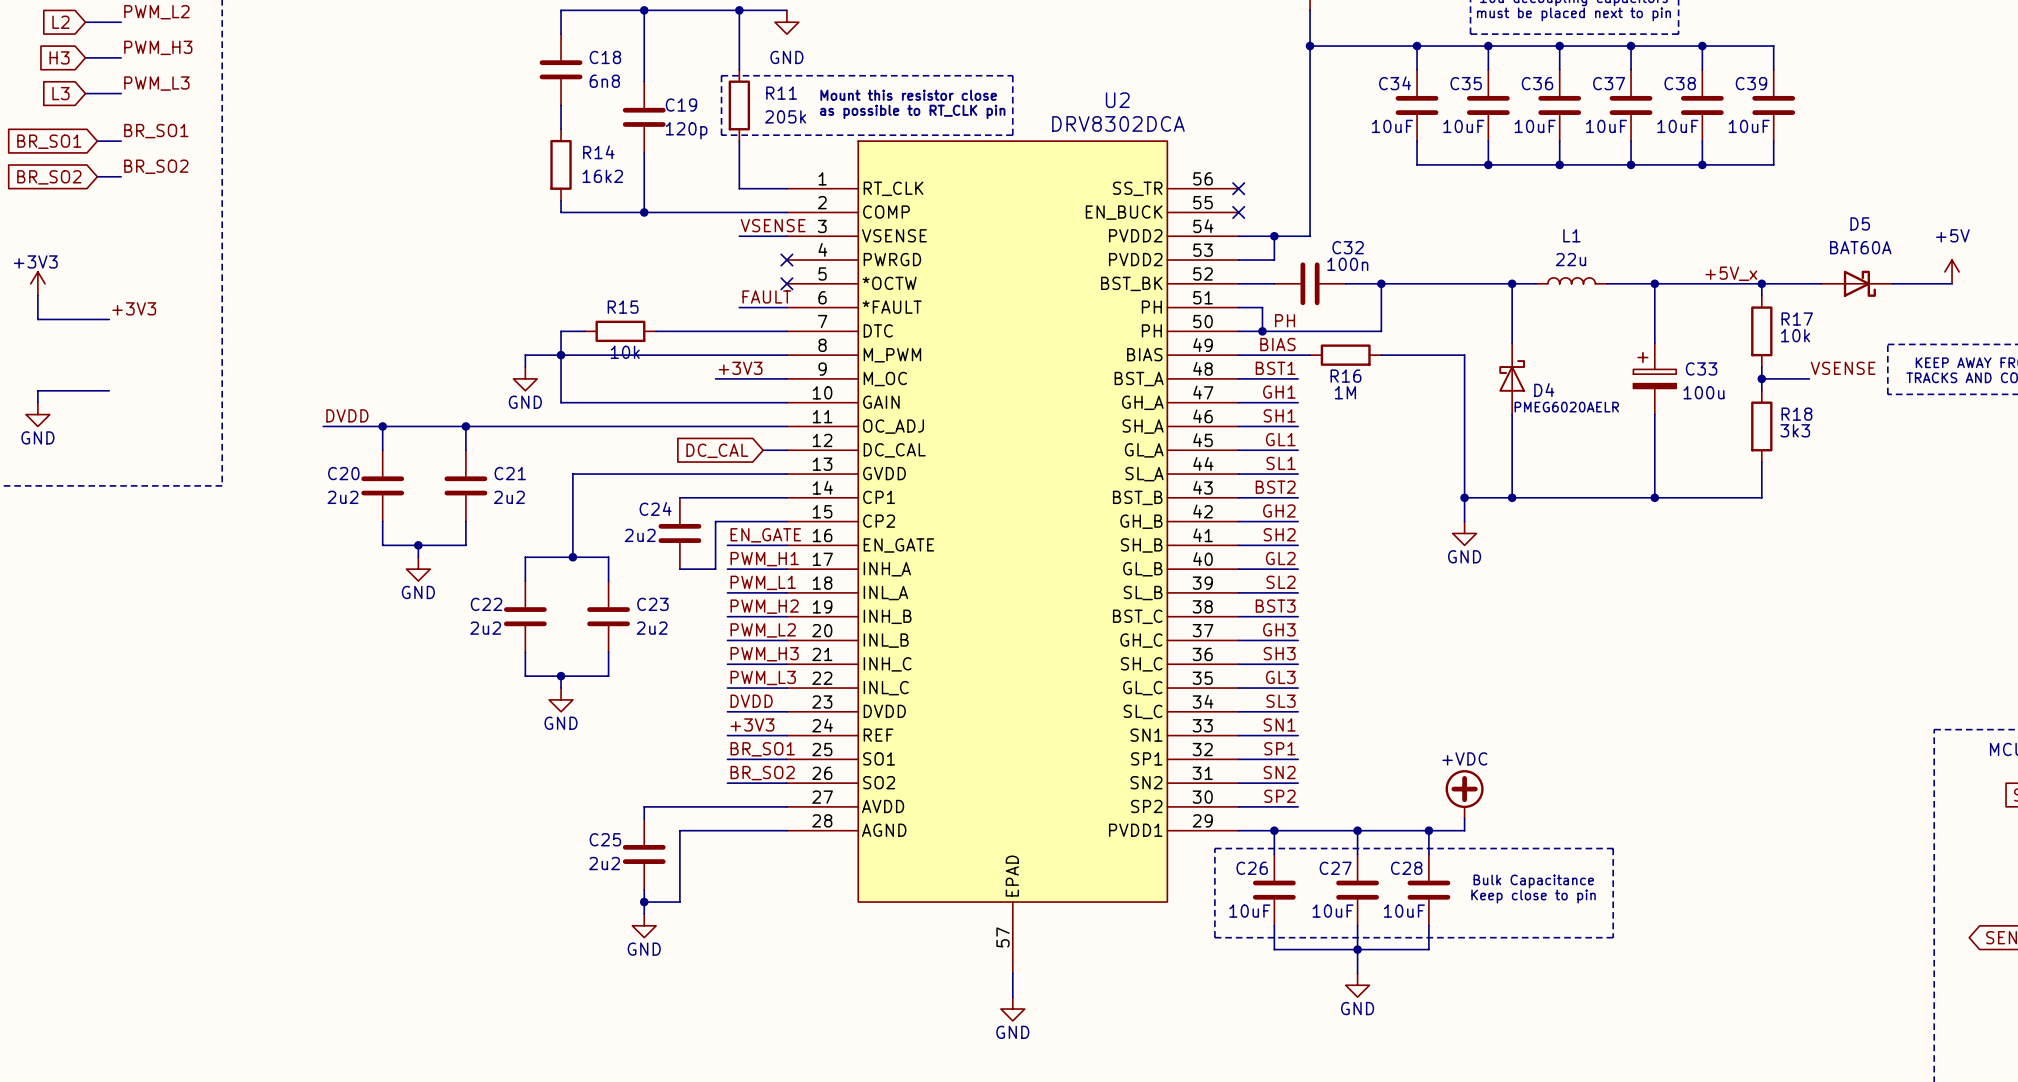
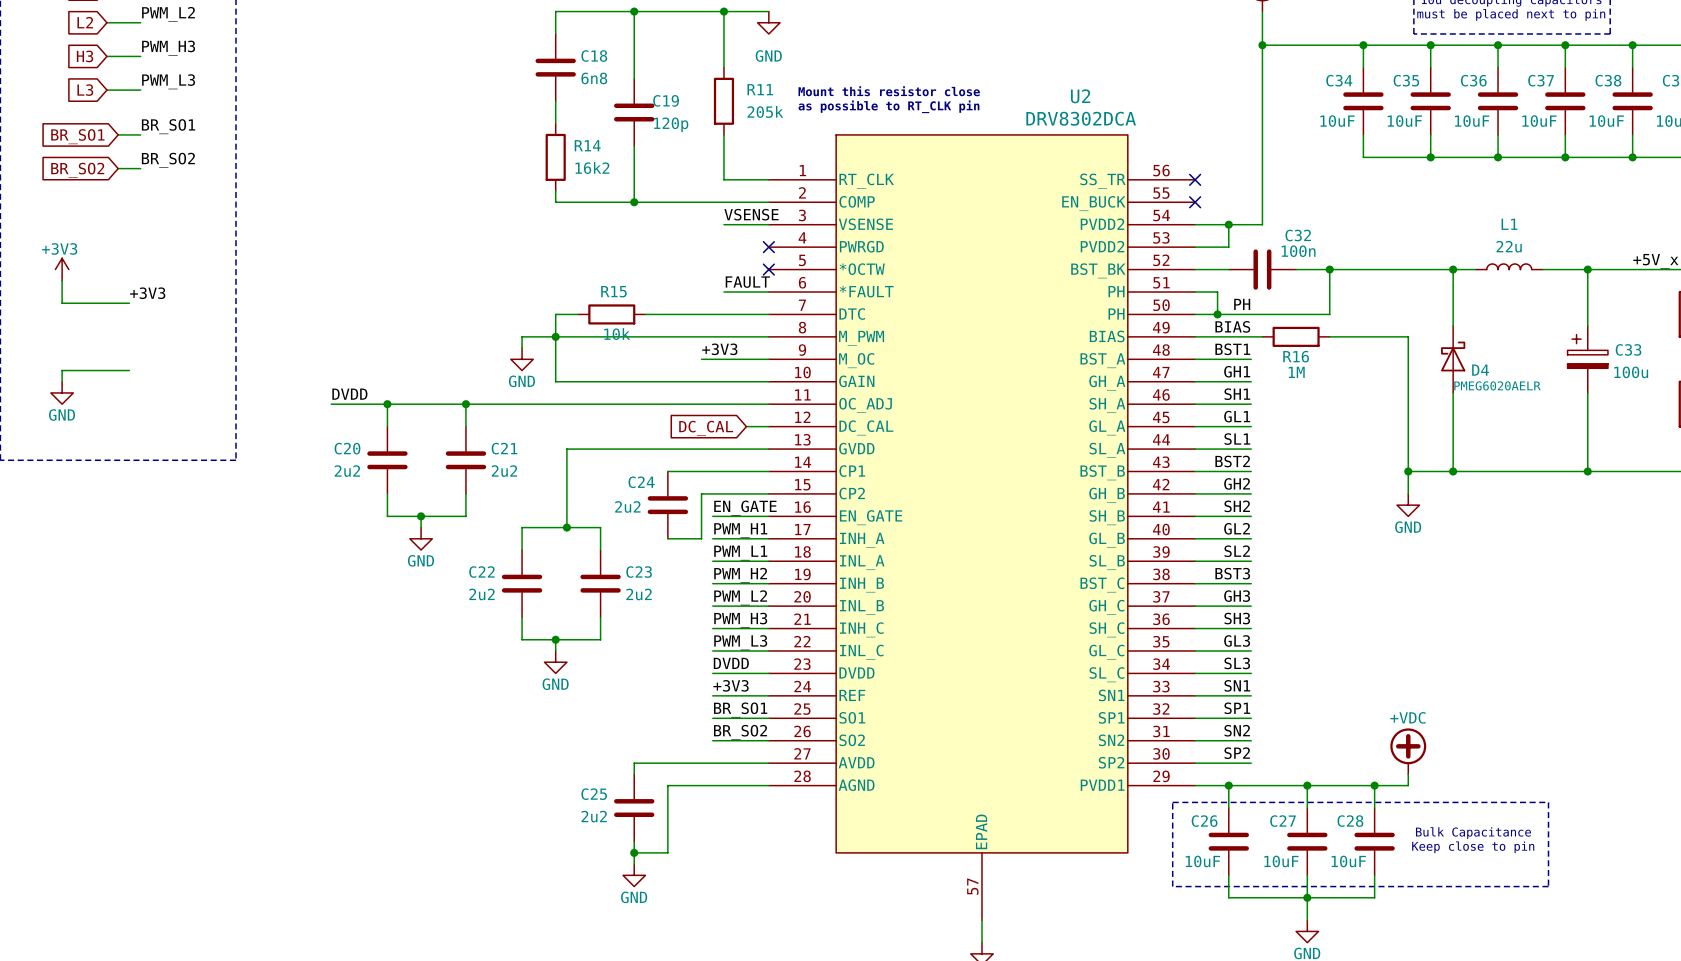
line: (721, 75) (1012, 75) (1012, 135) (721, 135) (721, 75) -> none

